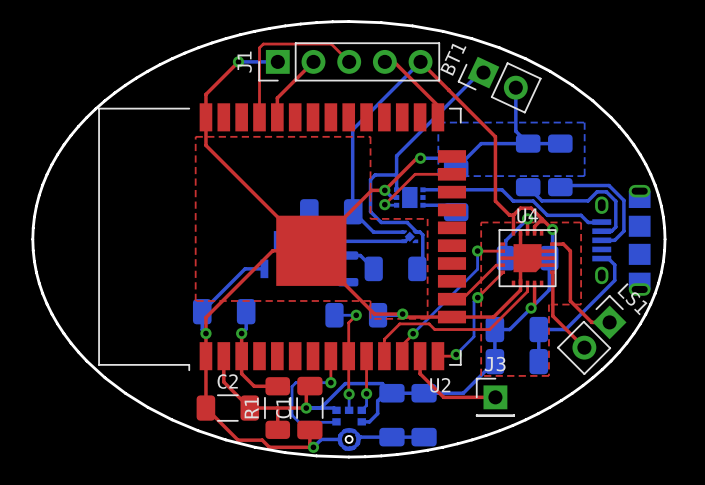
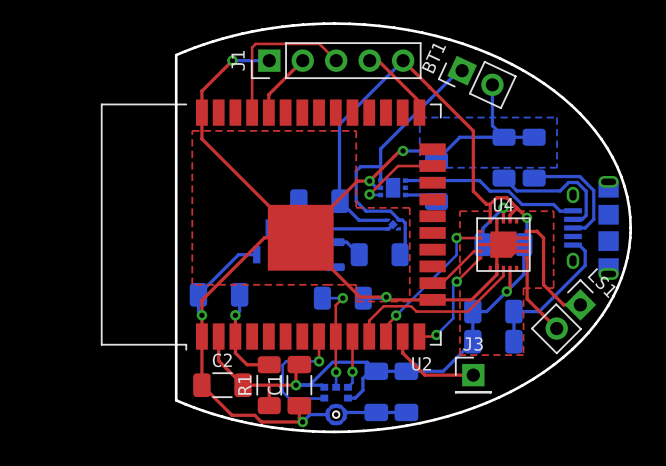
board edge: (348, 21) (285, 25) (254, 31) (211, 42) (159, 64) (136, 78) (104, 100) (78, 126) (63, 144) (42, 184) (34, 217) (32, 239) (34, 261) (39, 283) (57, 324) (86, 361) (104, 377) (147, 407) (198, 430) (254, 447) (285, 452) (348, 457) (412, 452) (442, 447) (485, 435) (525, 419) (572, 393) (611, 361) (633, 333) (655, 293) (663, 261) (664, 228) (658, 195) (645, 164) (619, 126) (592, 100) (550, 71) (499, 47) (442, 31) (381, 22) (348, 21) -> (334, 23) (292, 25) (252, 31) (213, 41) (176, 55) (176, 400) (203, 410) (242, 421) (282, 428) (313, 431) (348, 431) (392, 427) (460, 412) (510, 391) (543, 372) (572, 349) (602, 314) (621, 277) (629, 247) (630, 217) (624, 186) (612, 157) (587, 121) (562, 97) (522, 70) (475, 48) (436, 35) (379, 25) (334, 23)

